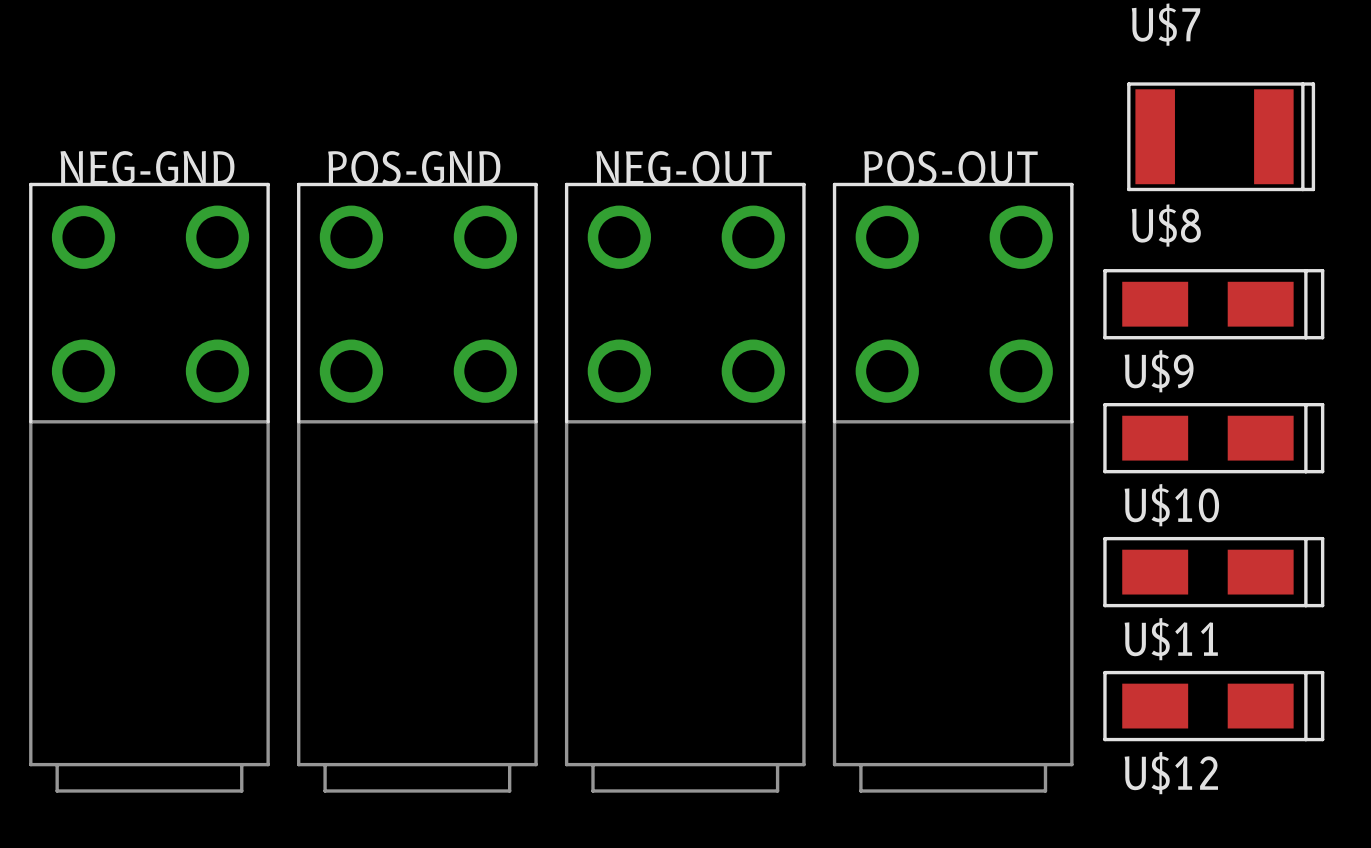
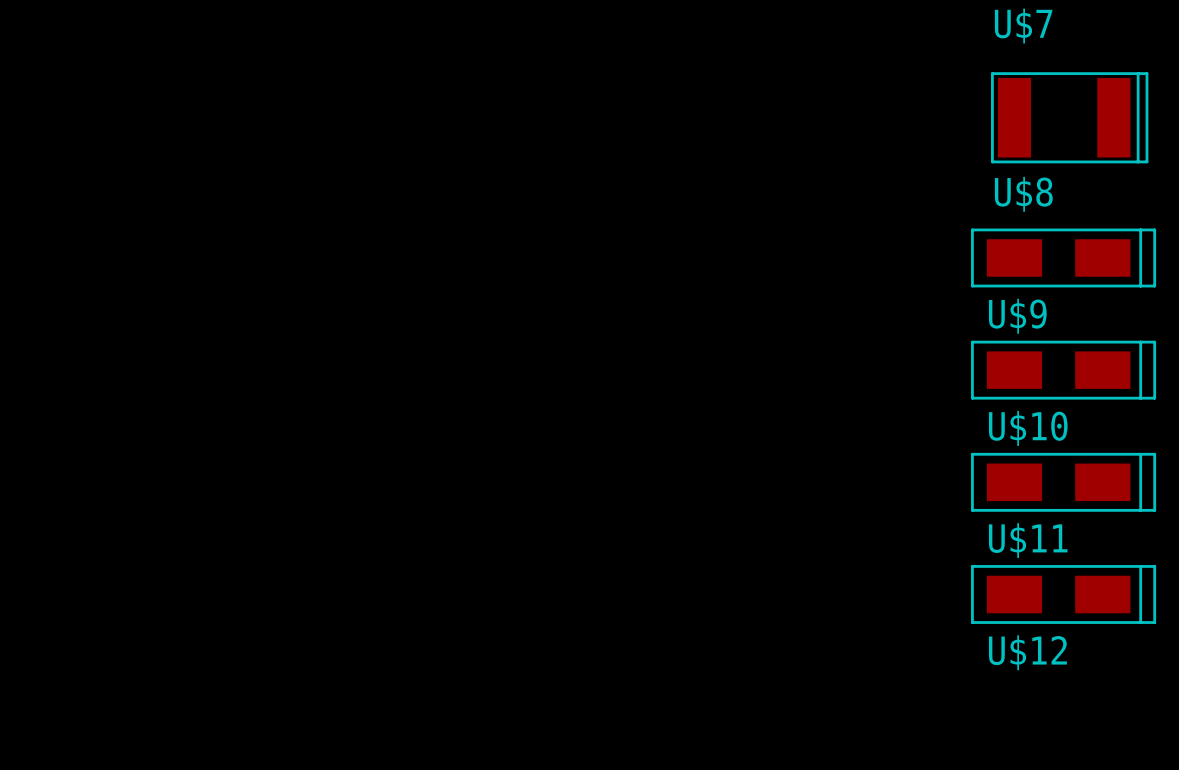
NEG-GND: (149, 487) -> none
POS-GND: (417, 487) -> none
NEG-OUT: (685, 487) -> none
POS-OUT: (953, 487) -> none

